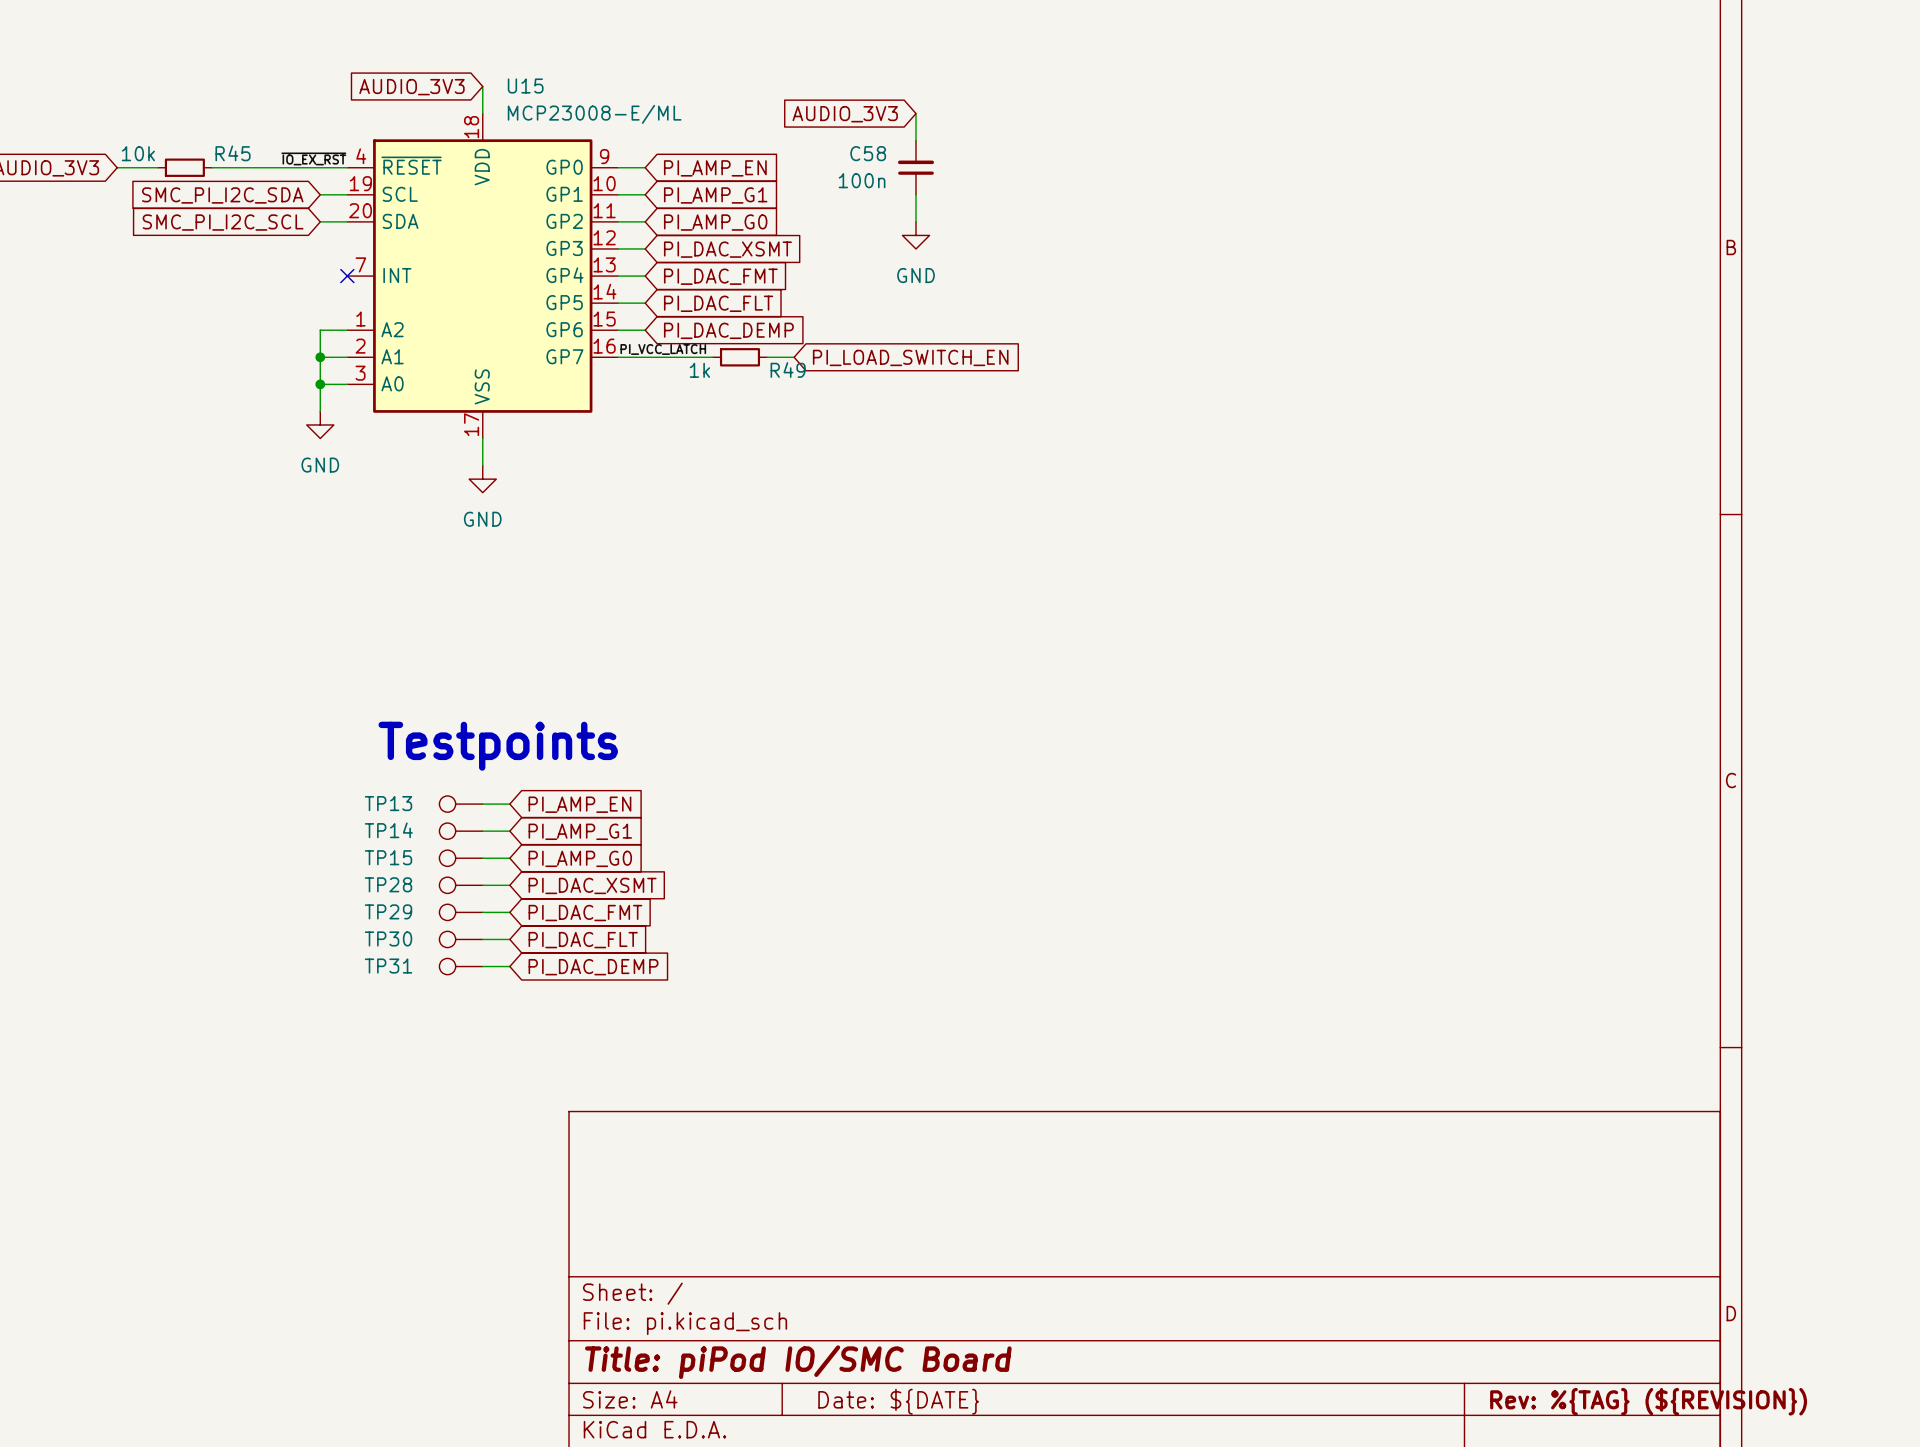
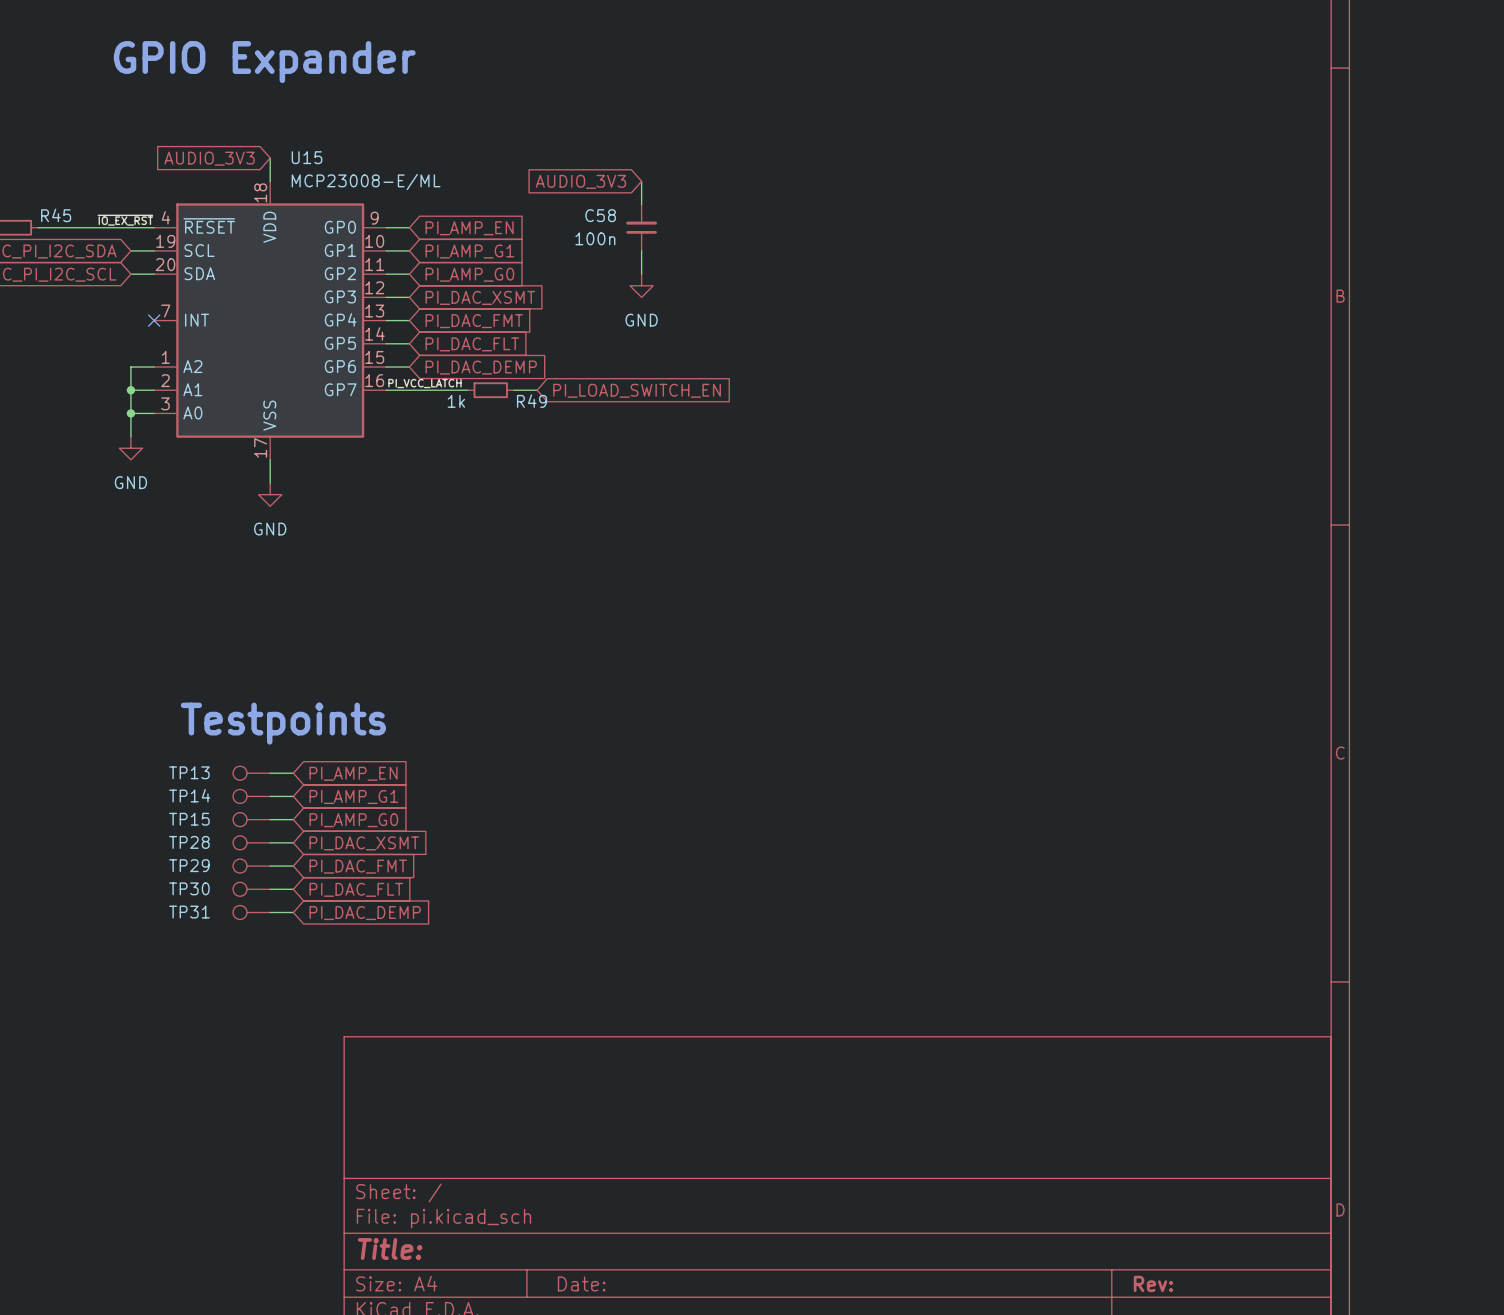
title block: Title: piPod IO/SMC Board (798, 1362) -> Title: (390, 1249)
title block: Date: ${DATE} (898, 1401) -> Date: (581, 1283)
title block: Rev: %{TAG} (${REVISION}) (1648, 1401) -> Rev: (1153, 1283)

